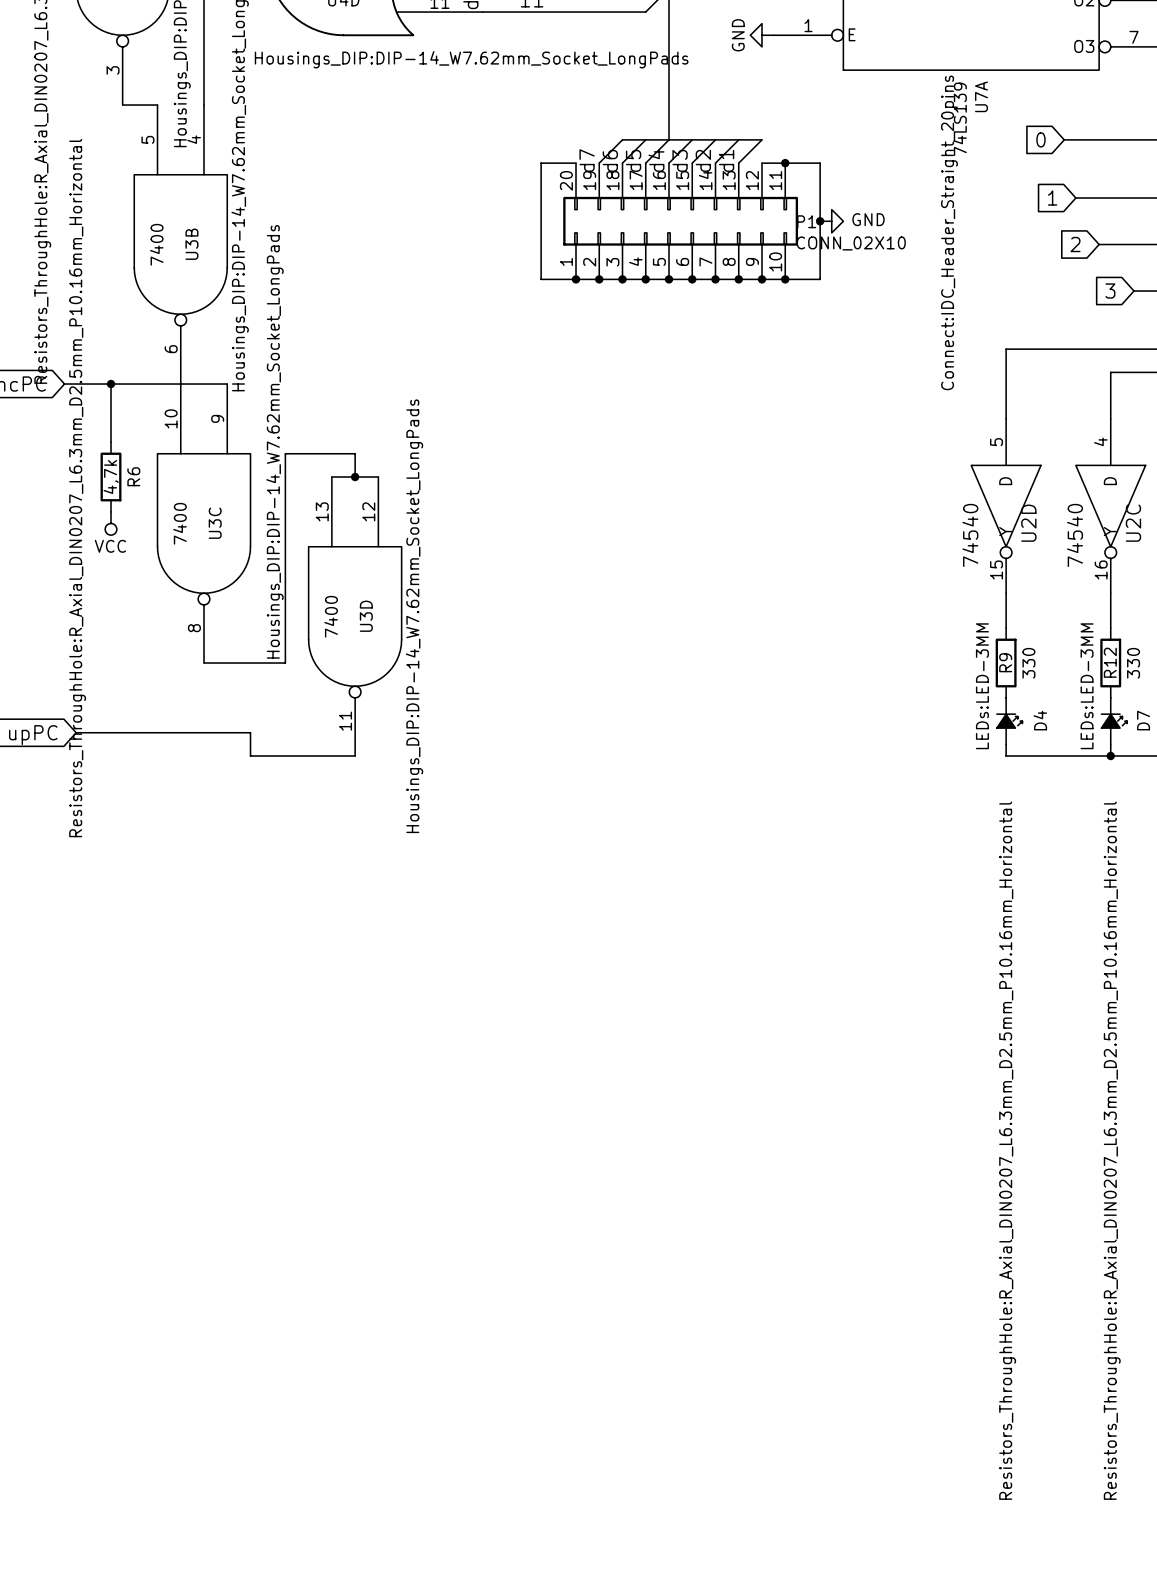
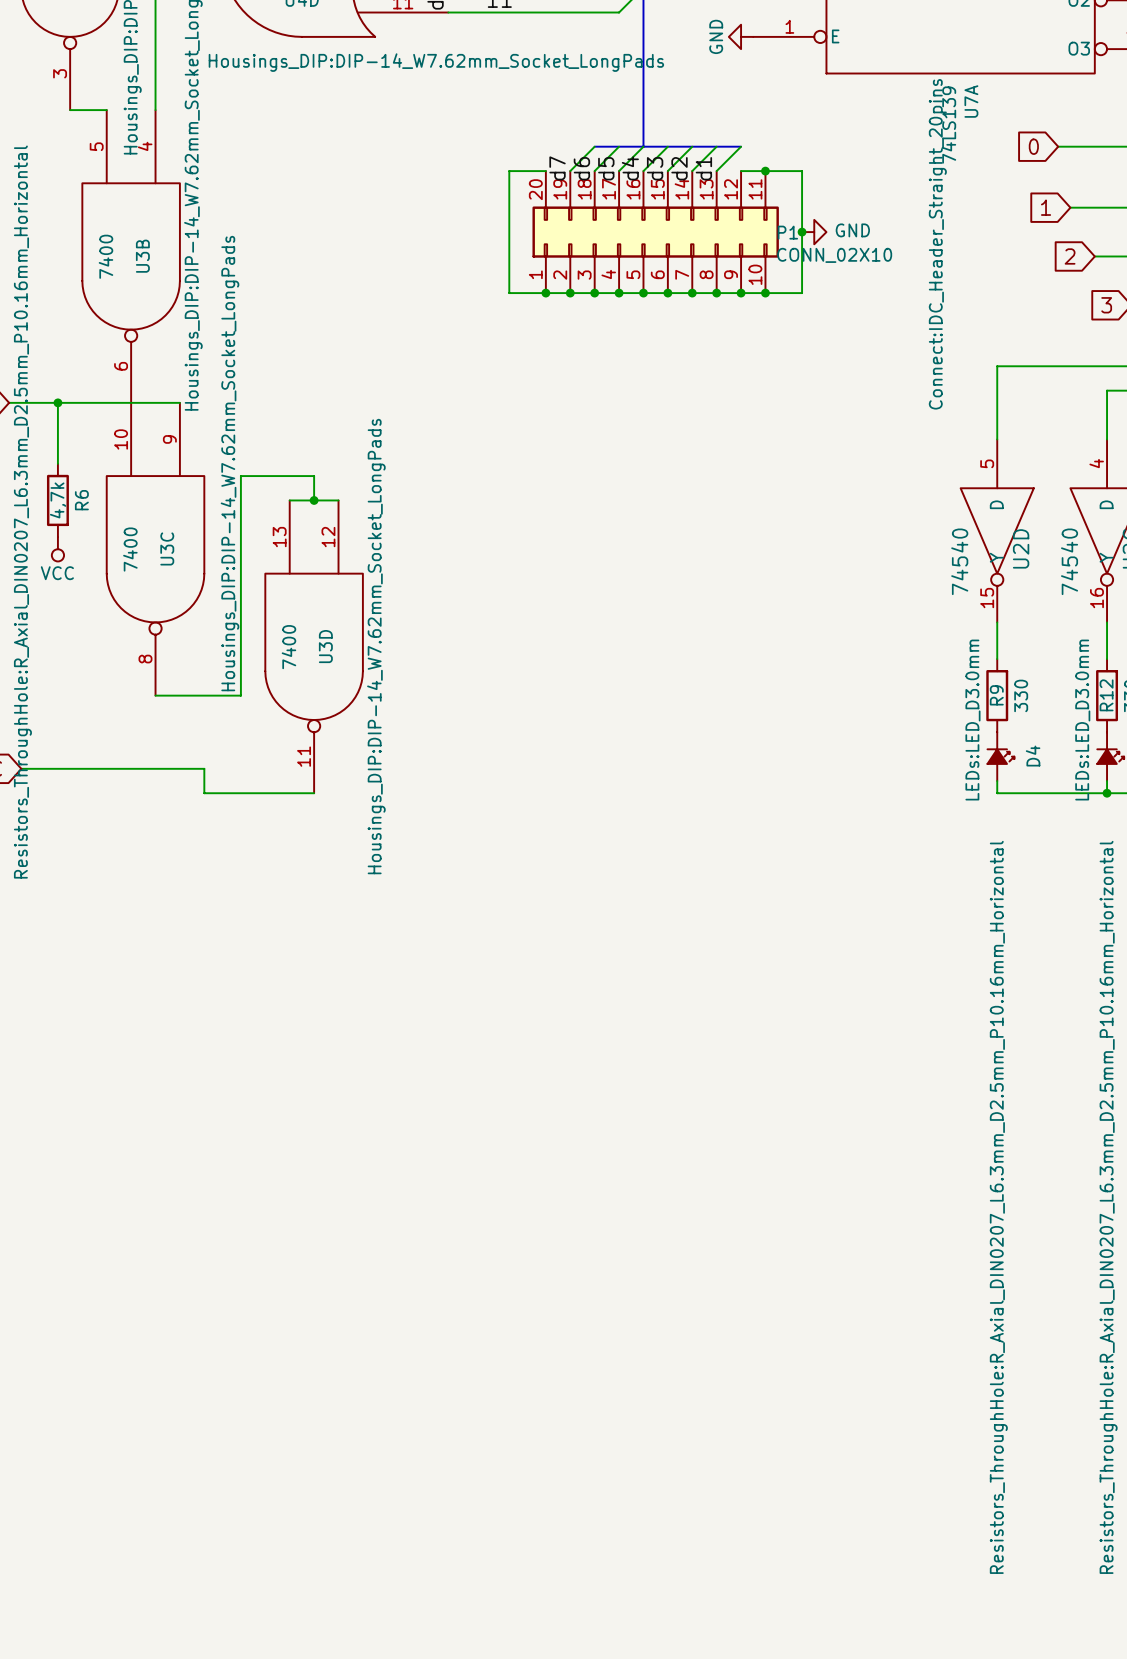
D4 text: LEDs:LED-3MM (982, 686) -> LEDs:LED_D3.0mm (972, 720)
D7 text: LEDs:LED-3MM (1087, 686) -> LEDs:LED_D3.0mm (1082, 720)

